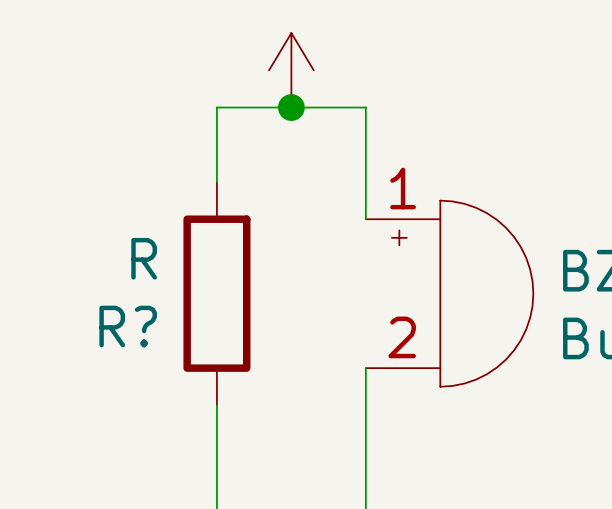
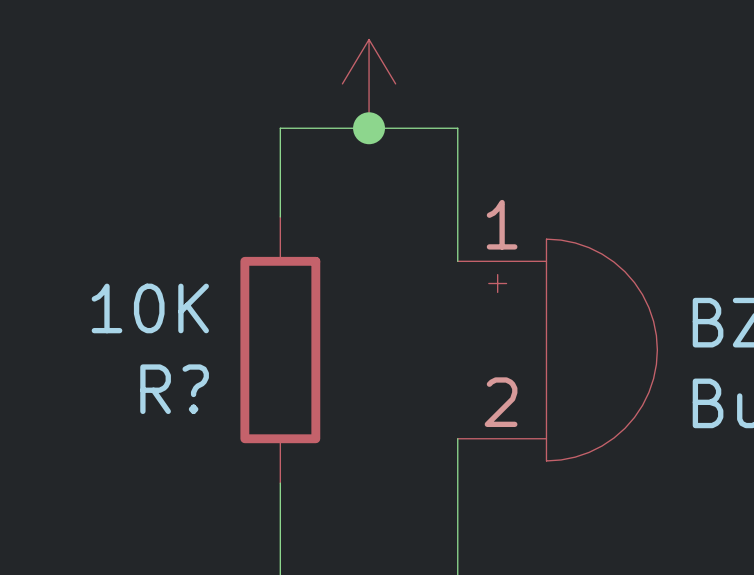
R? value: R (144, 258) -> 10K (150, 308)

